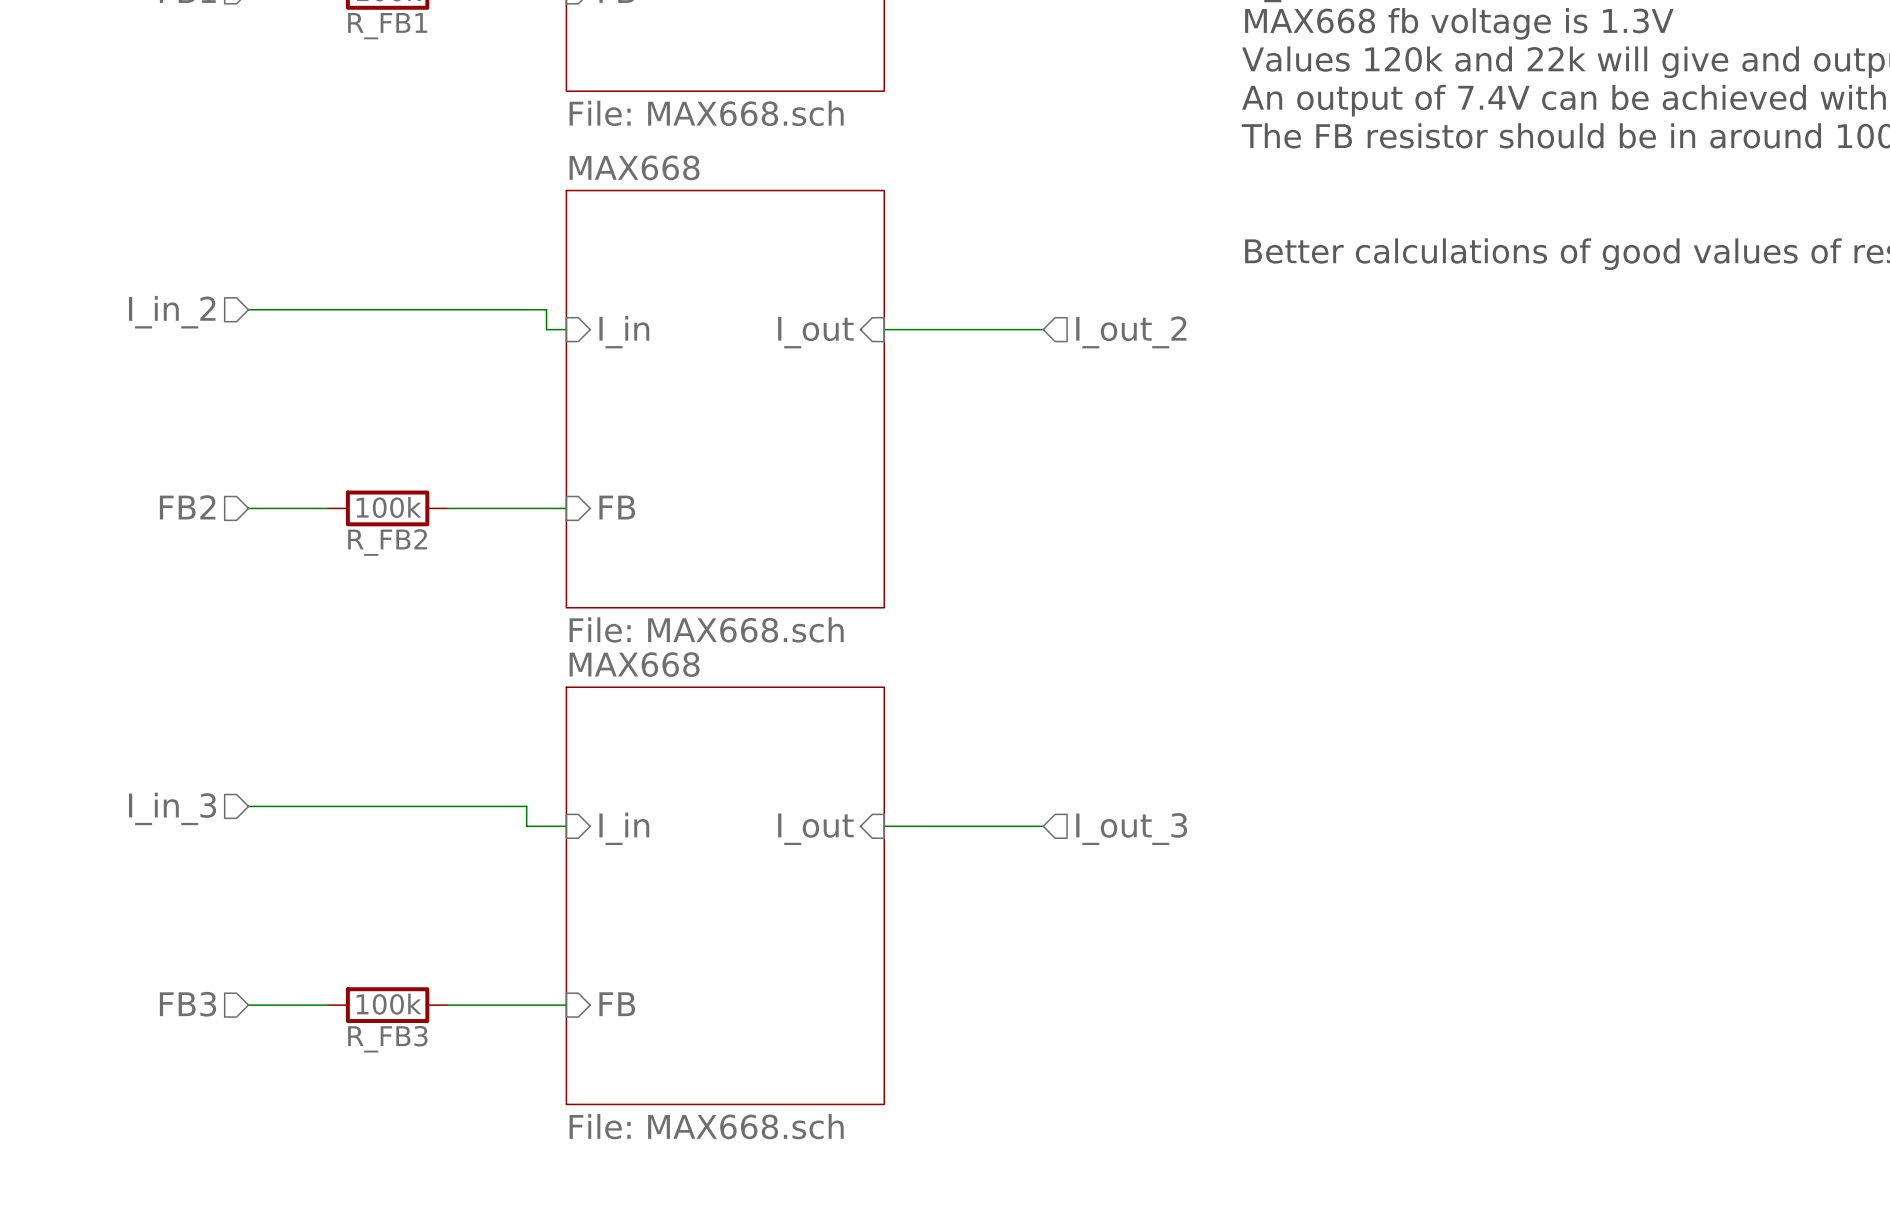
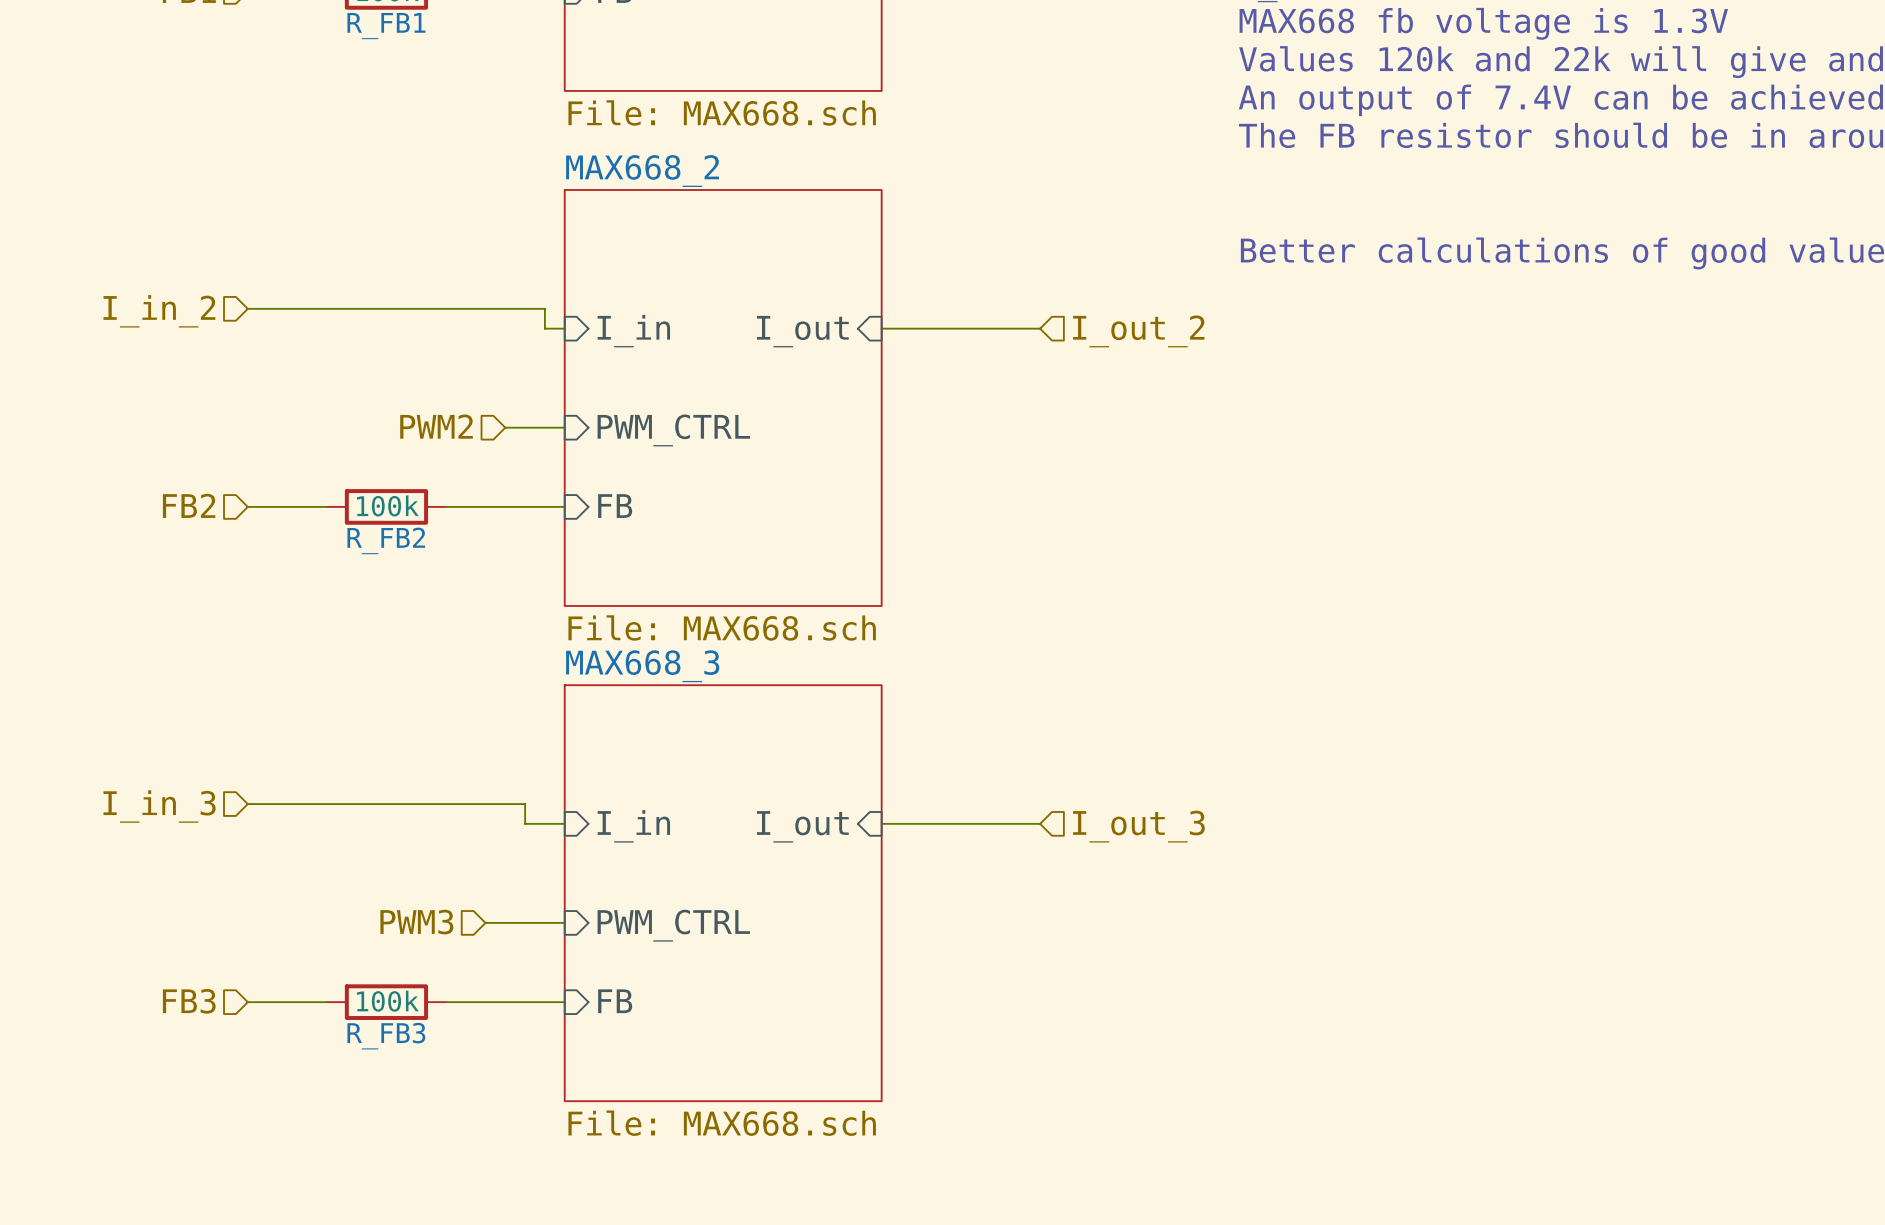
sheet MAX668 name: MAX668 (634, 167) -> MAX668_2 (642, 171)
hierarchical label: none -> PWM2 (436, 426)
wire: none -> (505, 427) (564, 427)
sheet pin: none -> PWM_CTRL (673, 430)
sheet MAX668 name: MAX668 (634, 664) -> MAX668_3 (642, 666)
hierarchical label: none -> PWM3 (416, 922)
wire: none -> (485, 922) (564, 922)
sheet pin: none -> PWM_CTRL (673, 925)

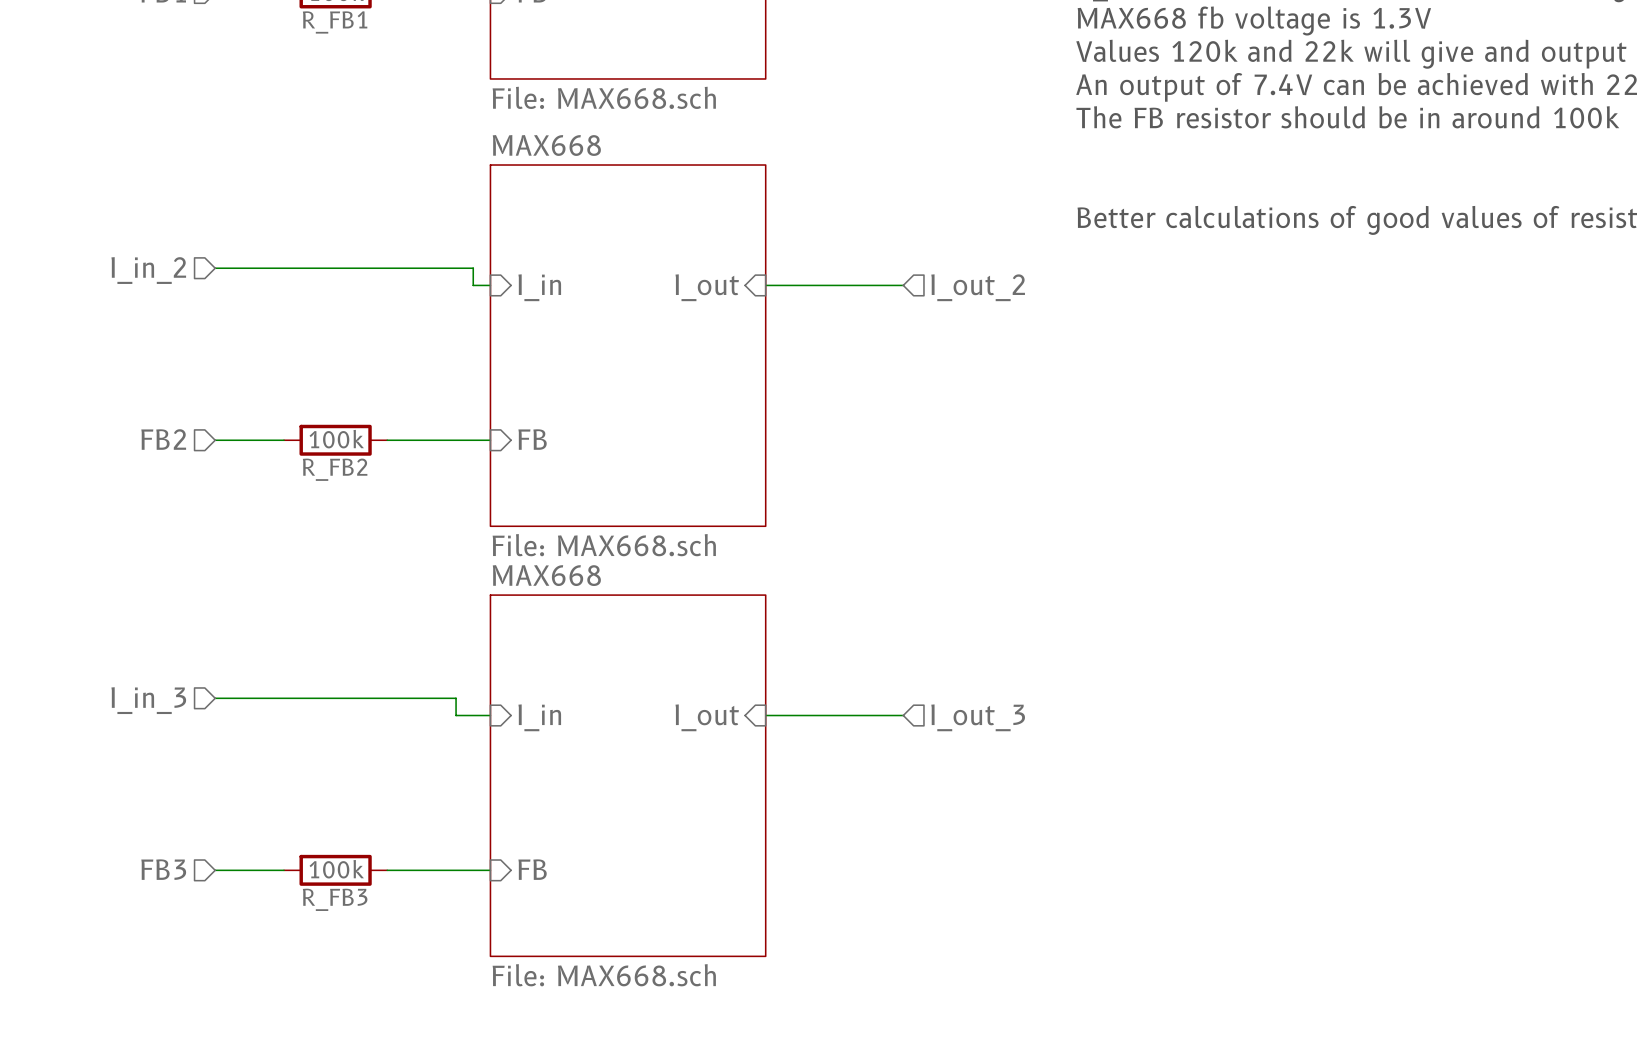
sheet MAX668_2 name: MAX668_2 (642, 171) -> MAX668 (546, 145)
hierarchical label: PWM2 (436, 426) -> none
wire: (505, 427) (564, 427) -> none
sheet pin: PWM_CTRL (673, 430) -> none
sheet MAX668_3 name: MAX668_3 (642, 666) -> MAX668 (546, 575)
hierarchical label: PWM3 (416, 922) -> none
wire: (485, 922) (564, 922) -> none
sheet pin: PWM_CTRL (673, 925) -> none

